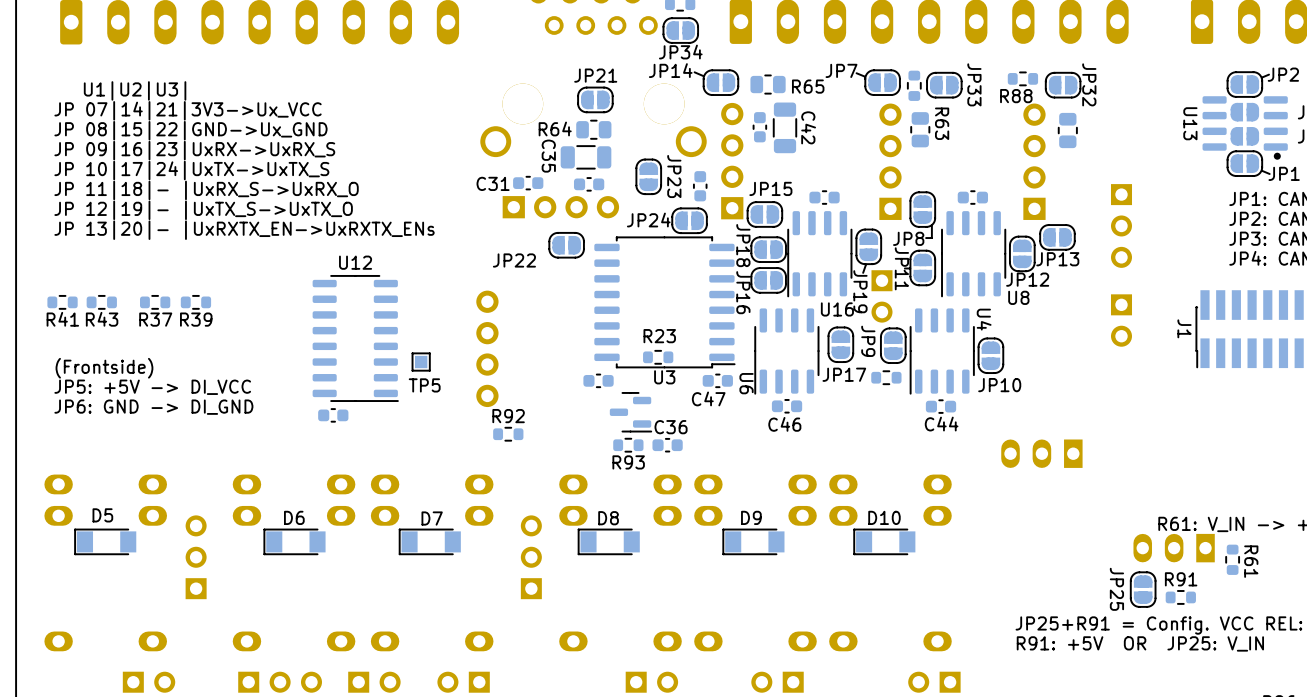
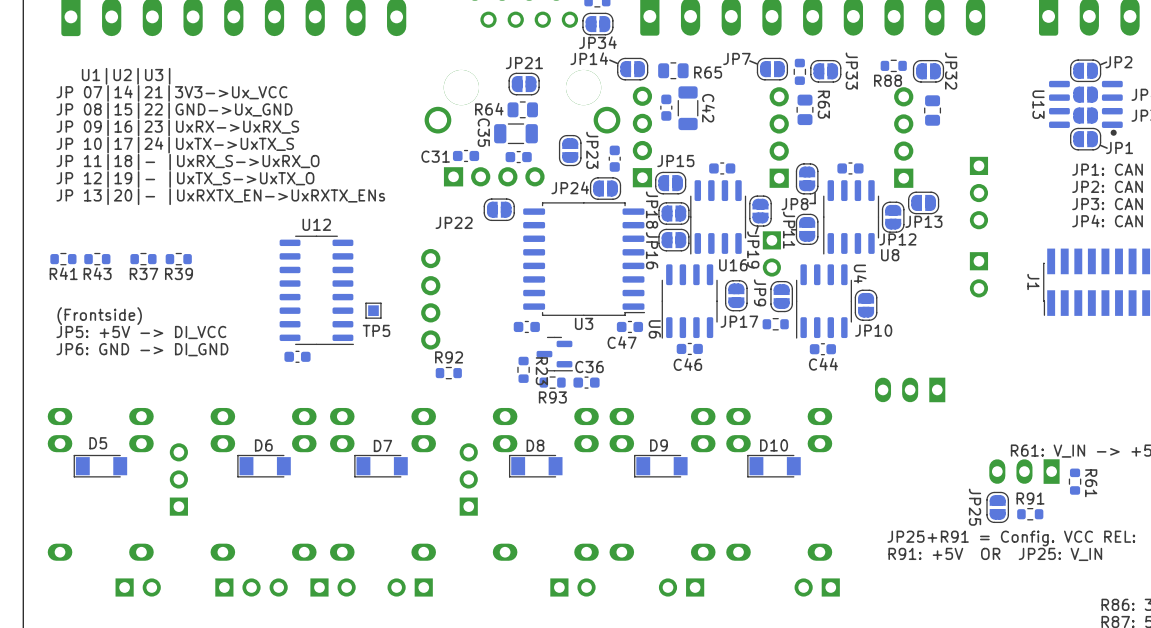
R23 rotation: 0° (658, 357) -> 90° clockwise (523, 369)
R23 position: (658, 357) -> (523, 369)

